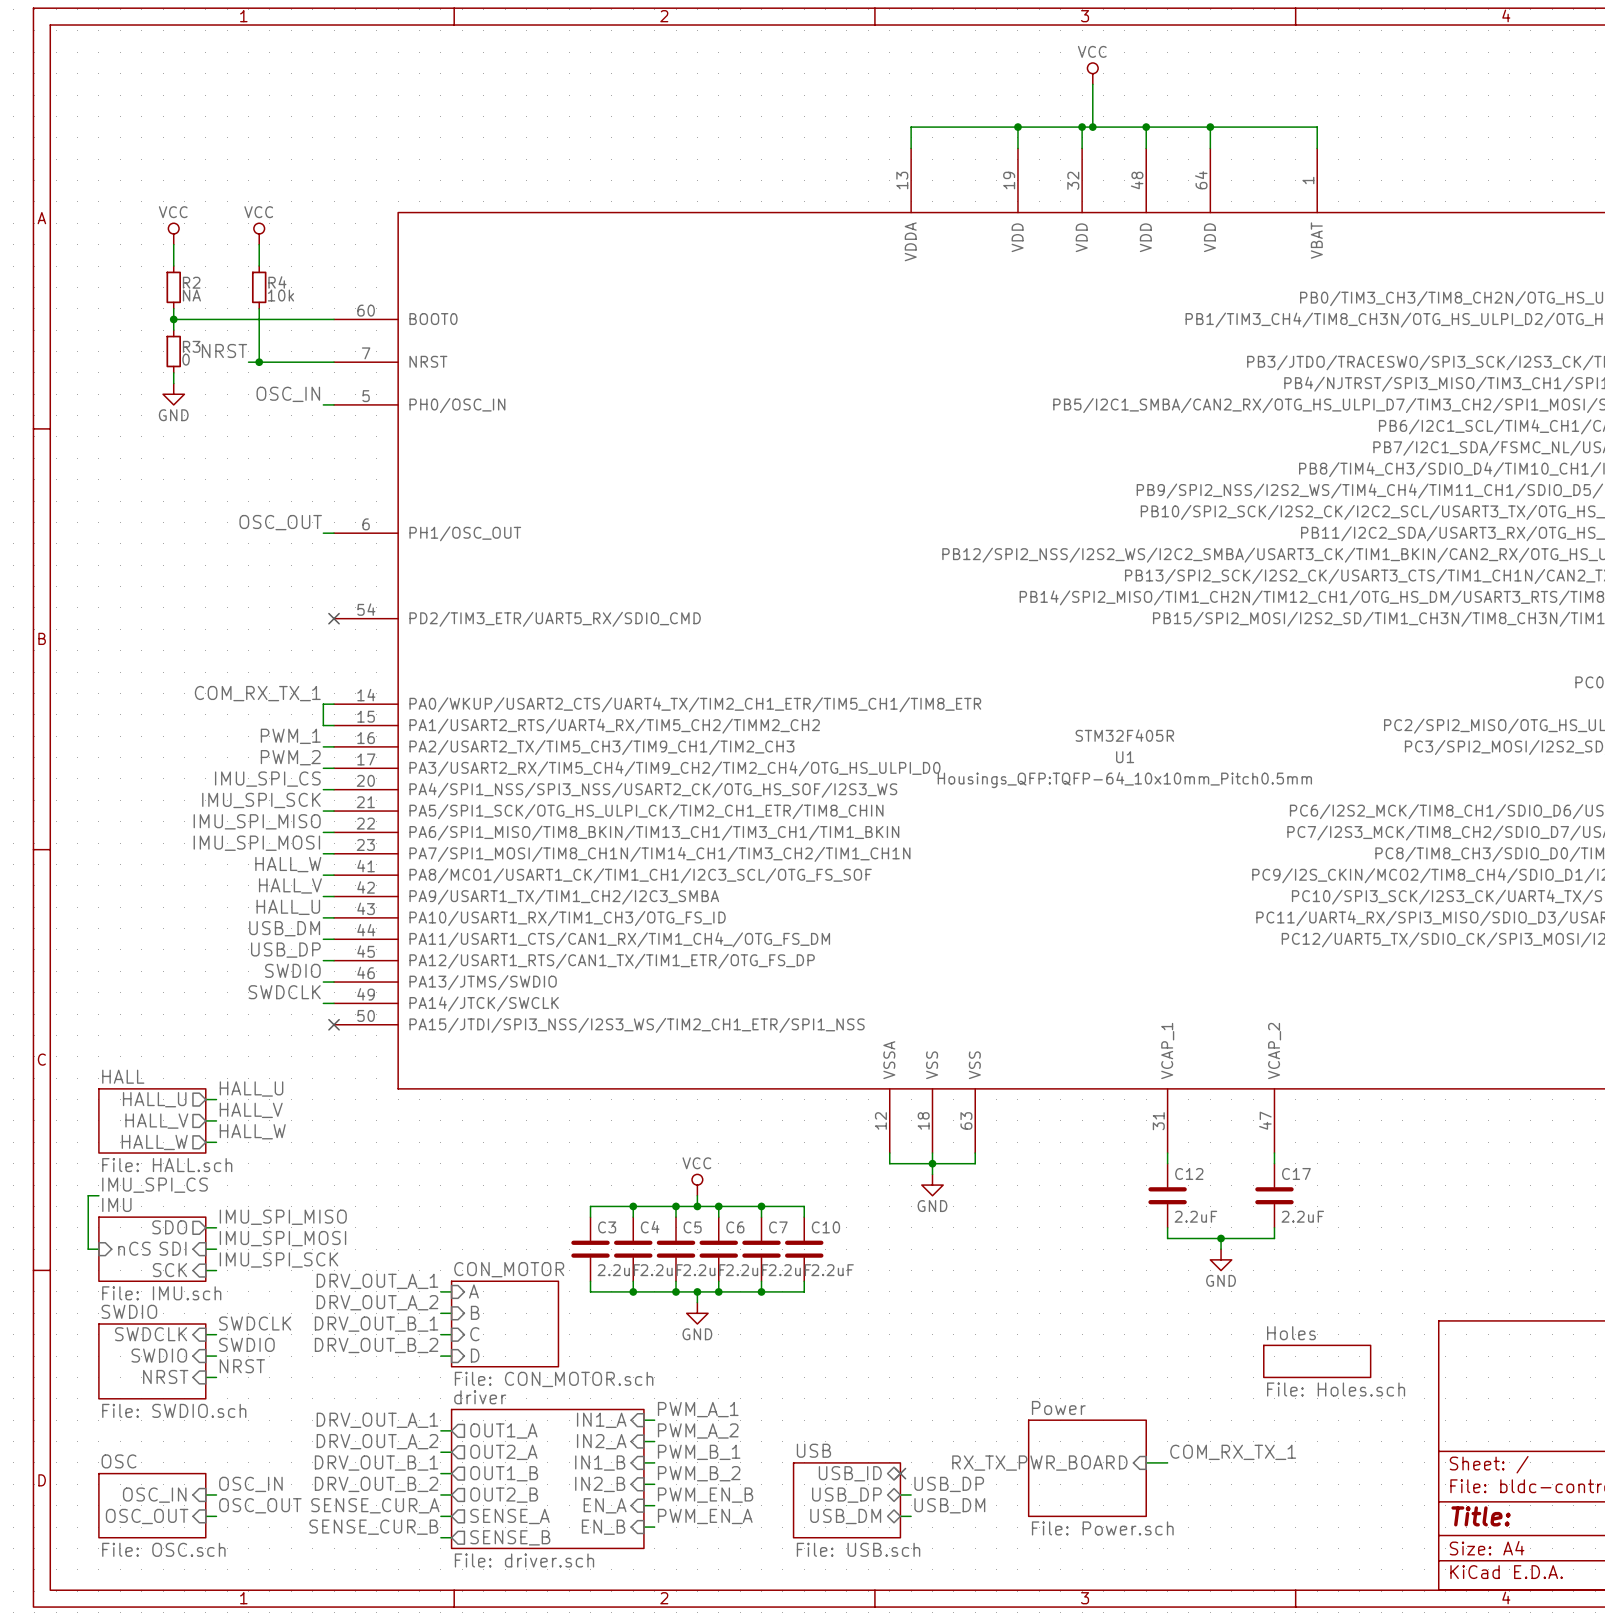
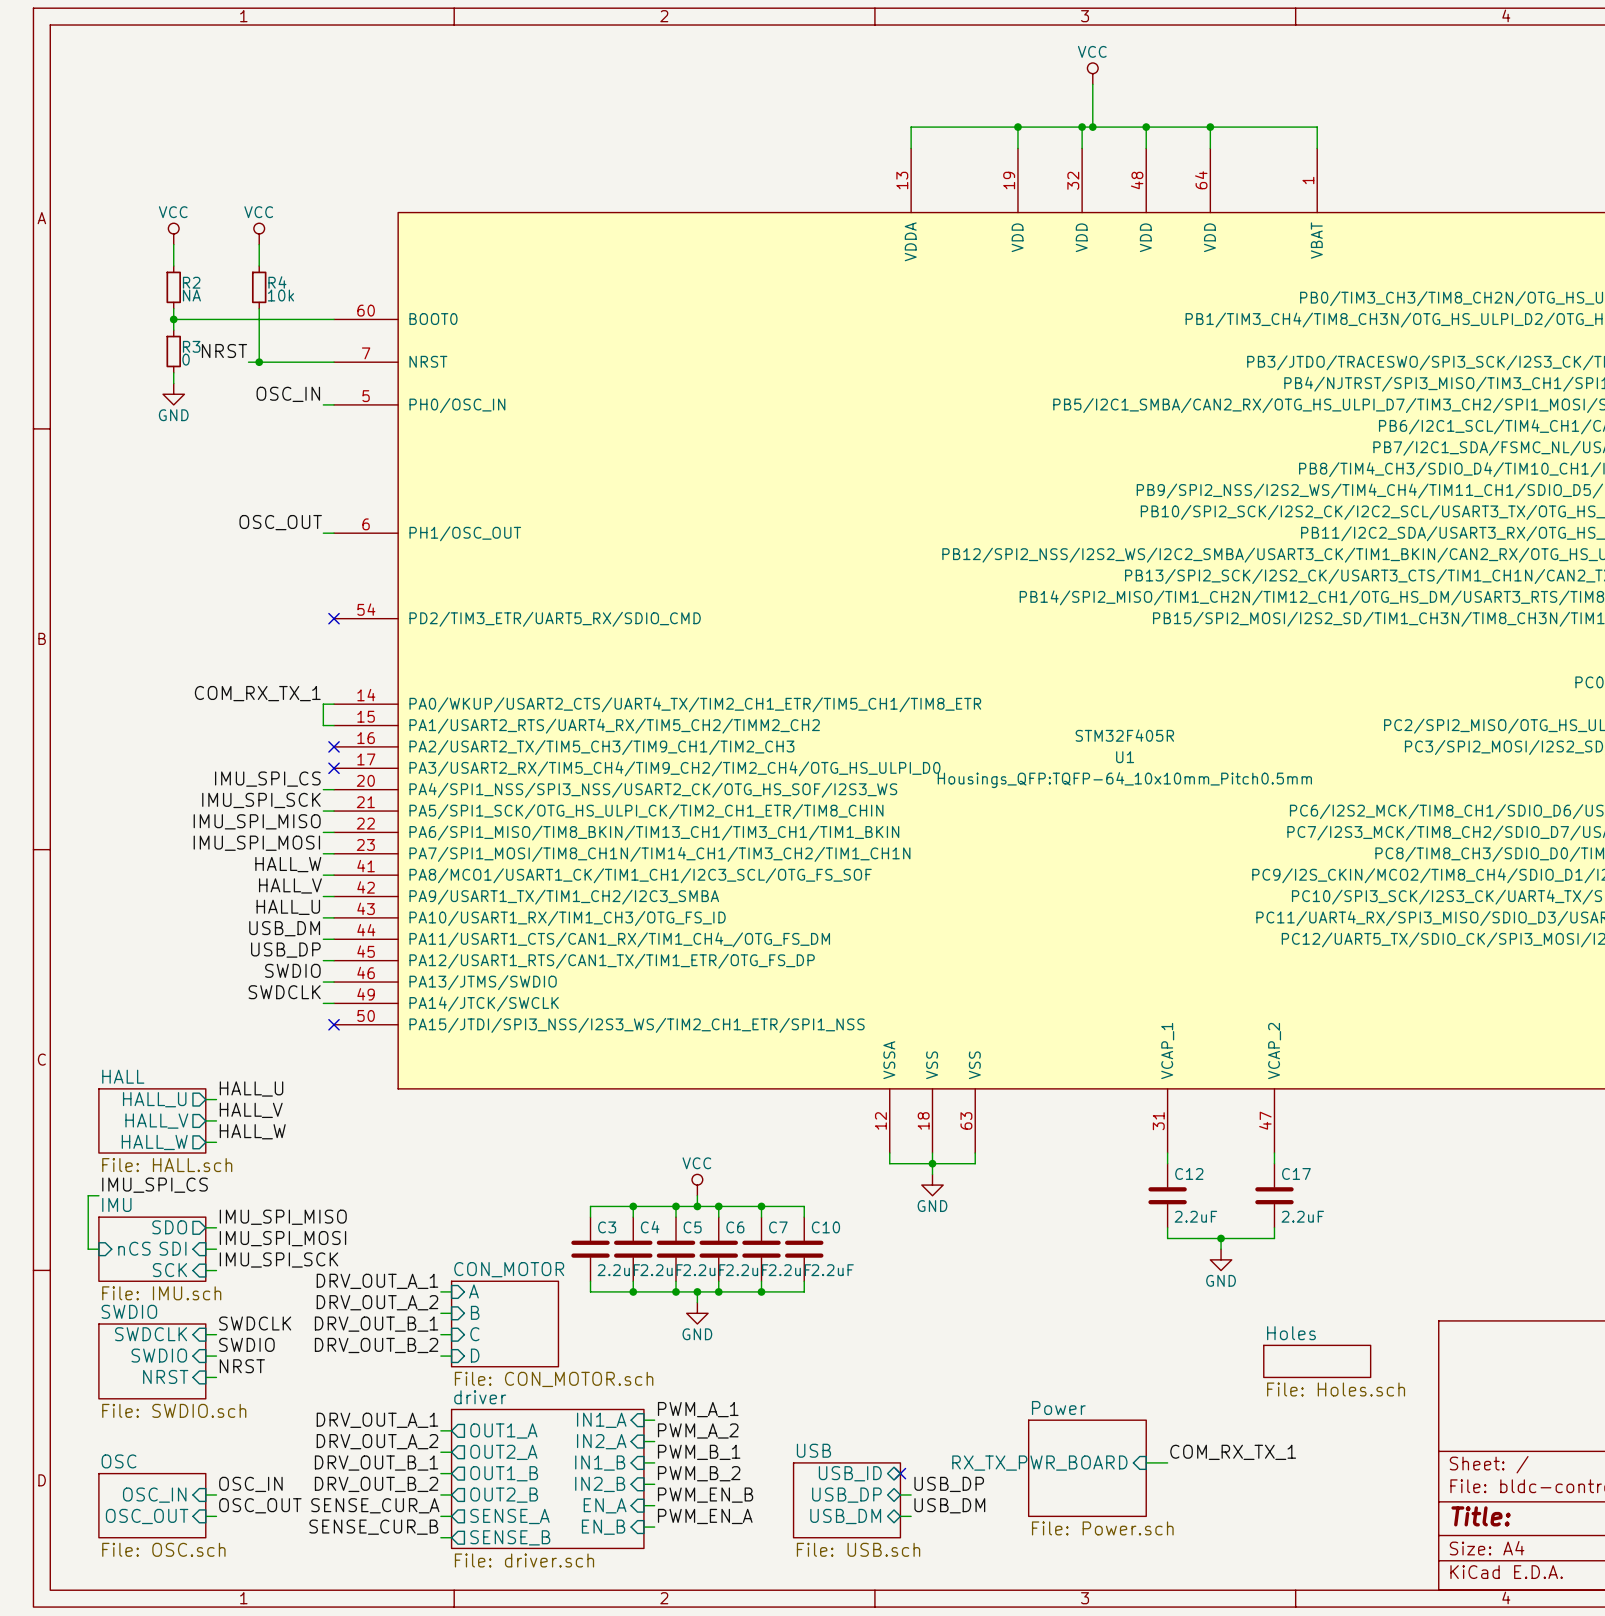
label: PWM_1 (290, 736) -> none
wire: (323, 746) (334, 746) -> none
no-connect mark: none -> (334, 746)
label: PWM_2 (290, 757) -> none
wire: (323, 768) (334, 768) -> none
no-connect mark: none -> (334, 768)

